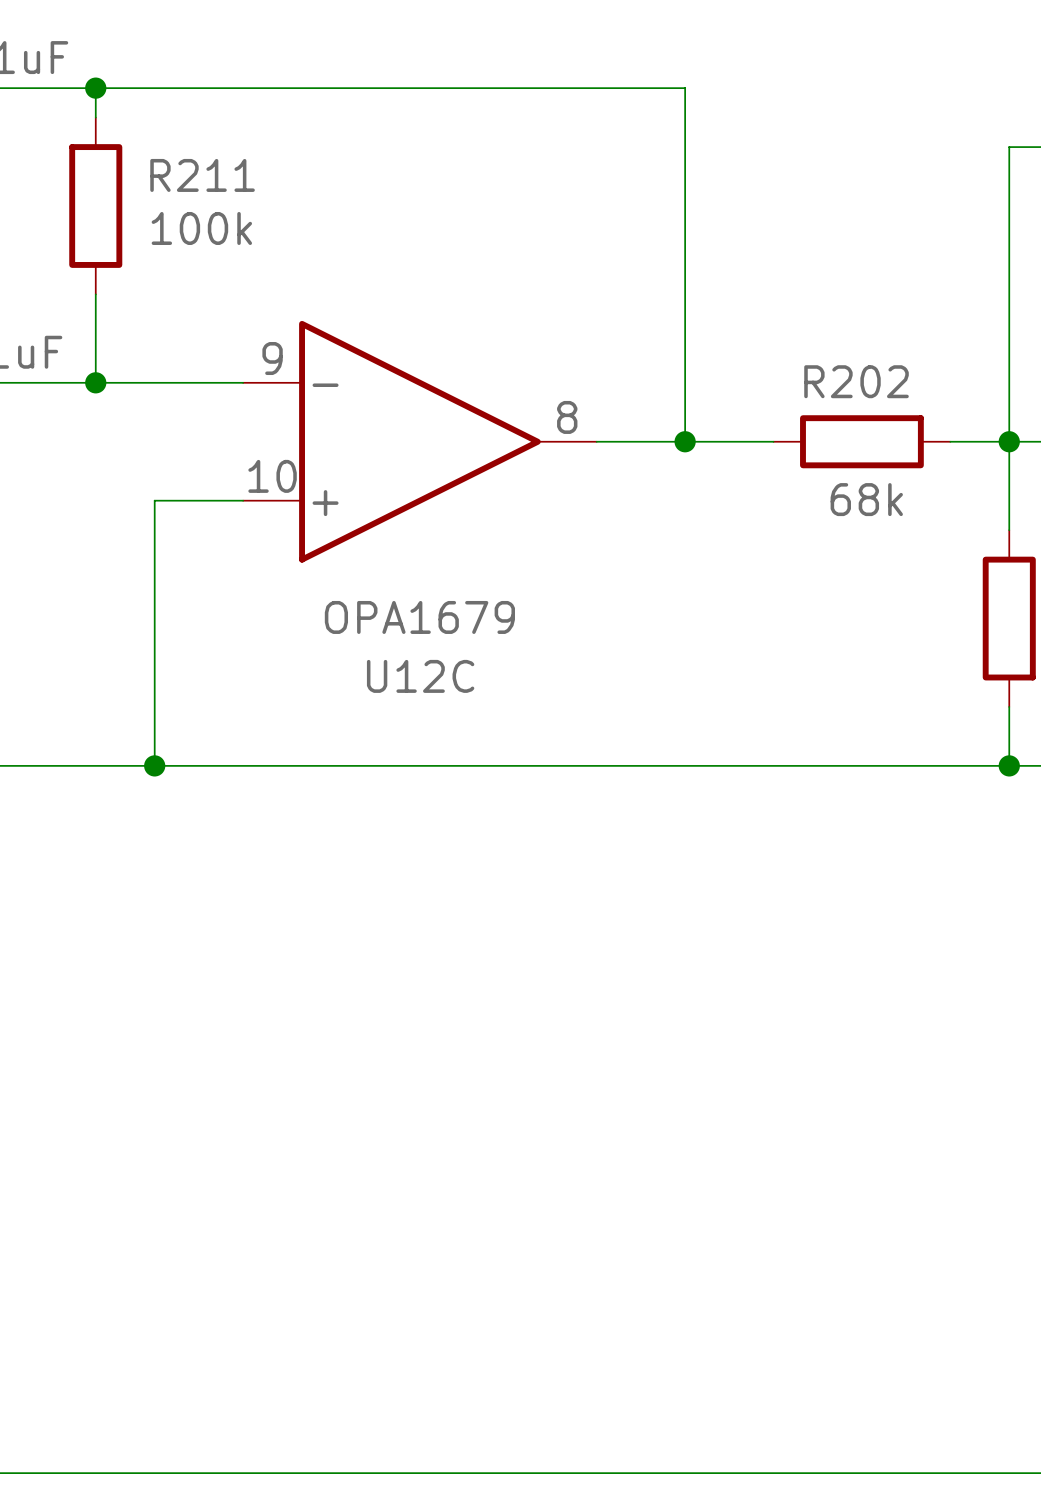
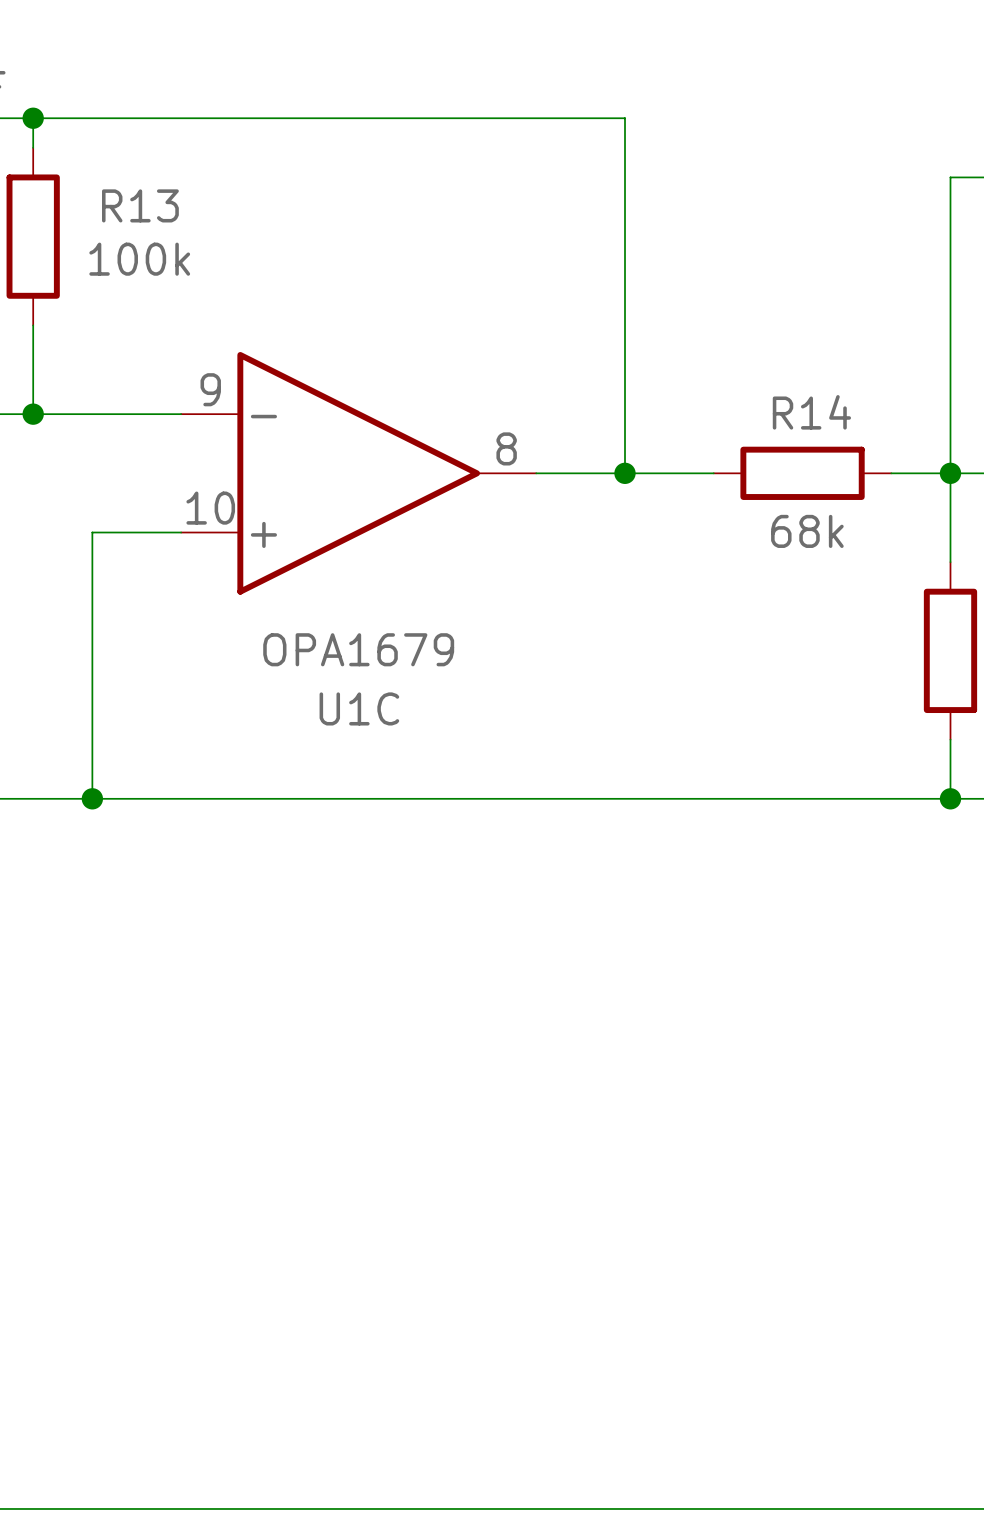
R211 name: R211 (202, 175) -> R13 (140, 205)
R202 name: R202 (856, 381) -> R14 (811, 412)
U12C name: U12C (420, 676) -> U1C (359, 708)

